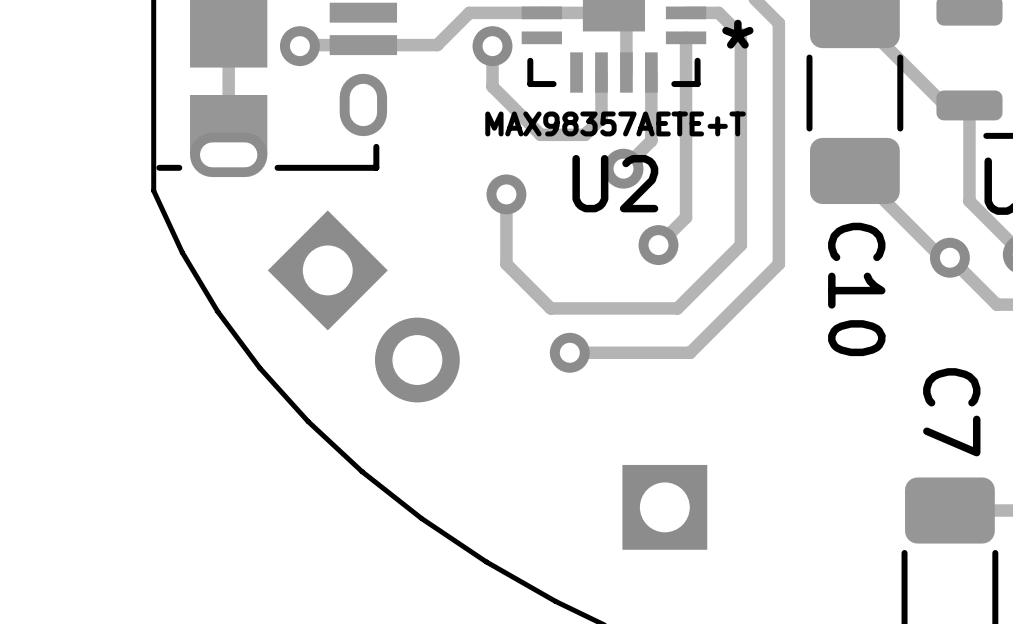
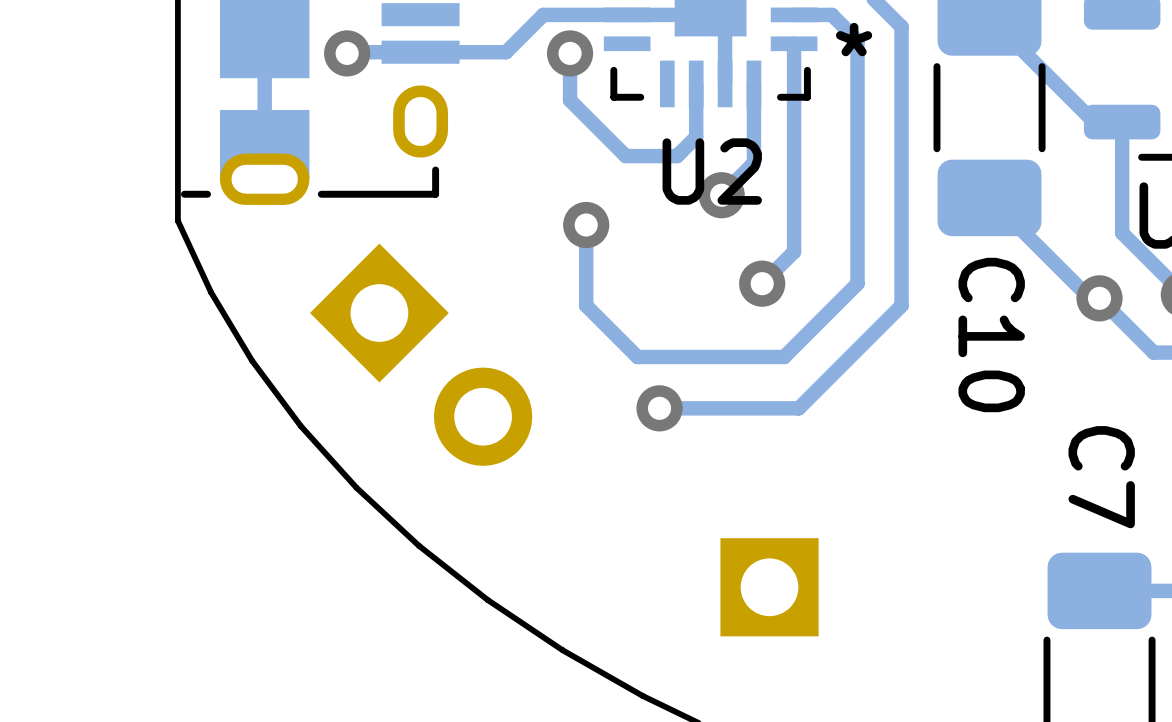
U2 value: MAX98357AETE+T (615, 123) -> none
U2 name position: U2 (615, 183) -> U2 (712, 171)

